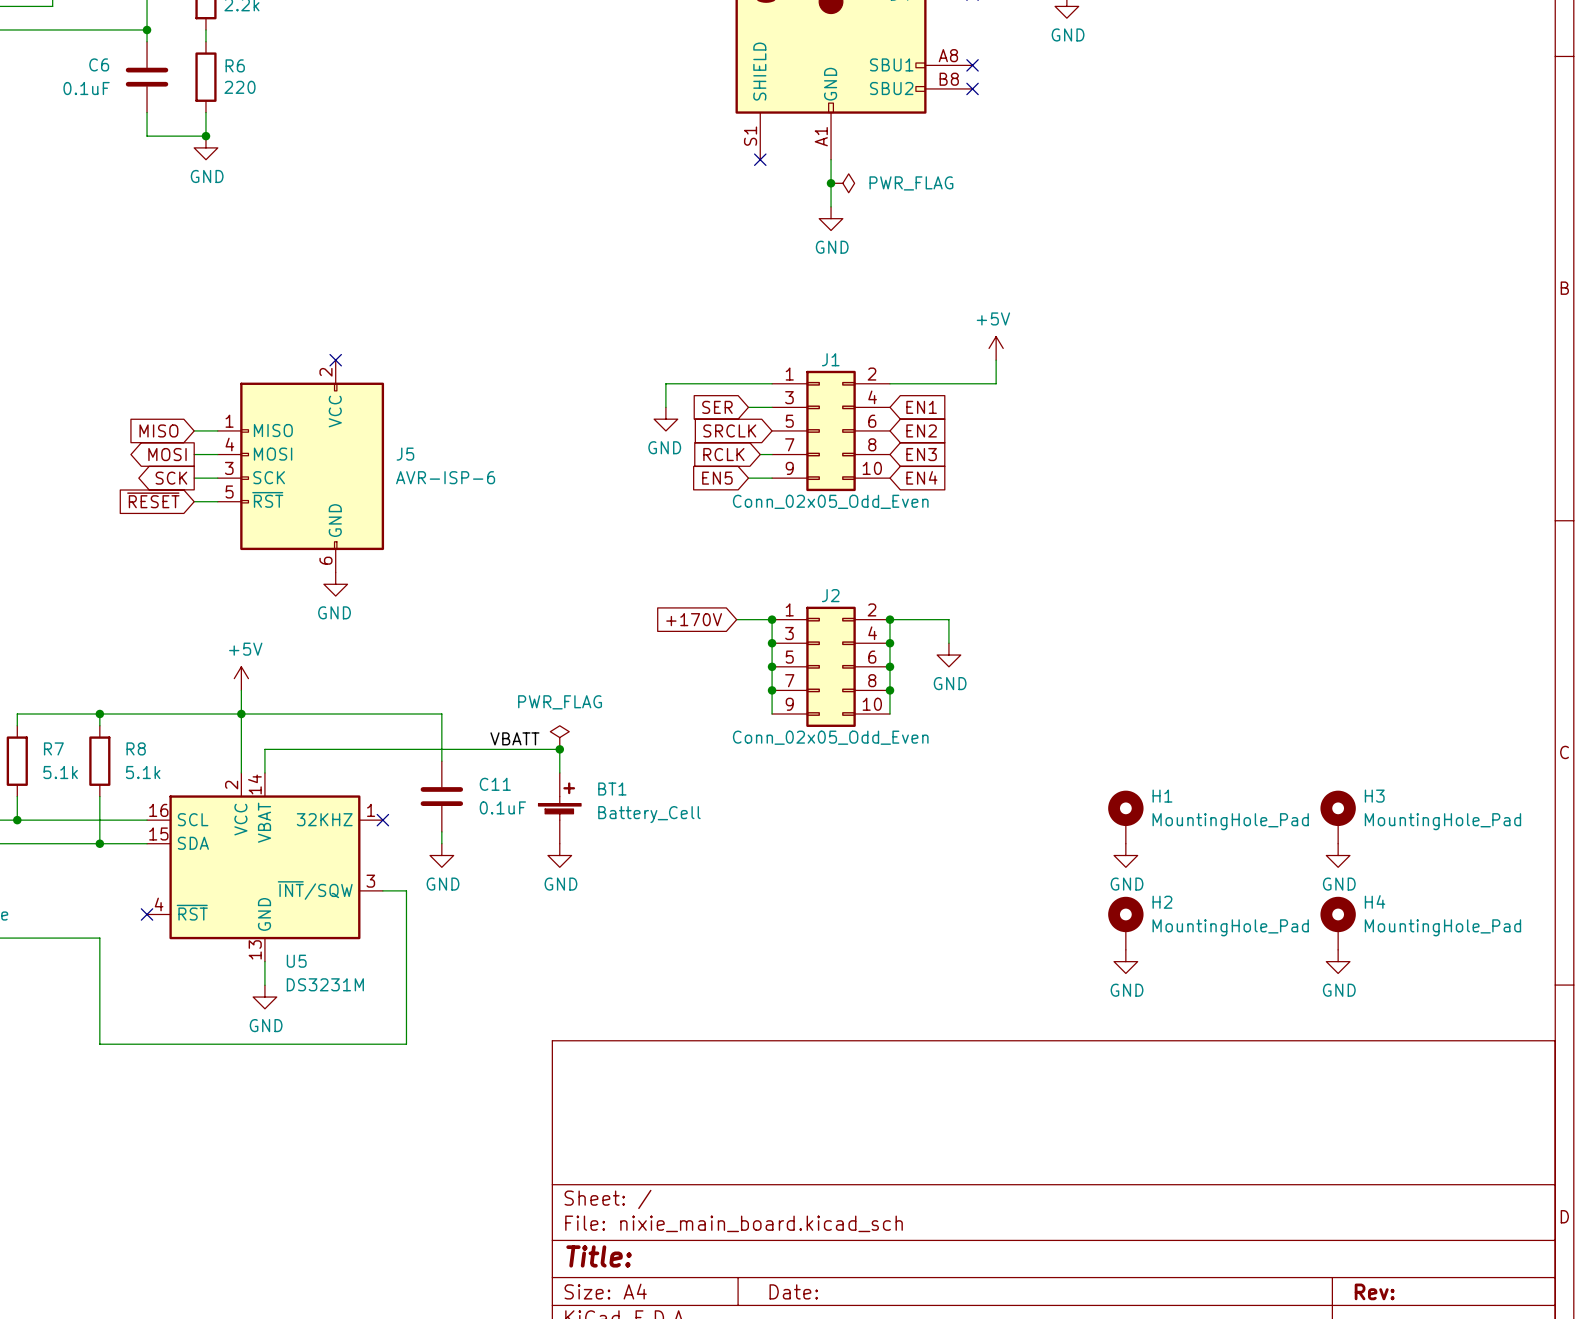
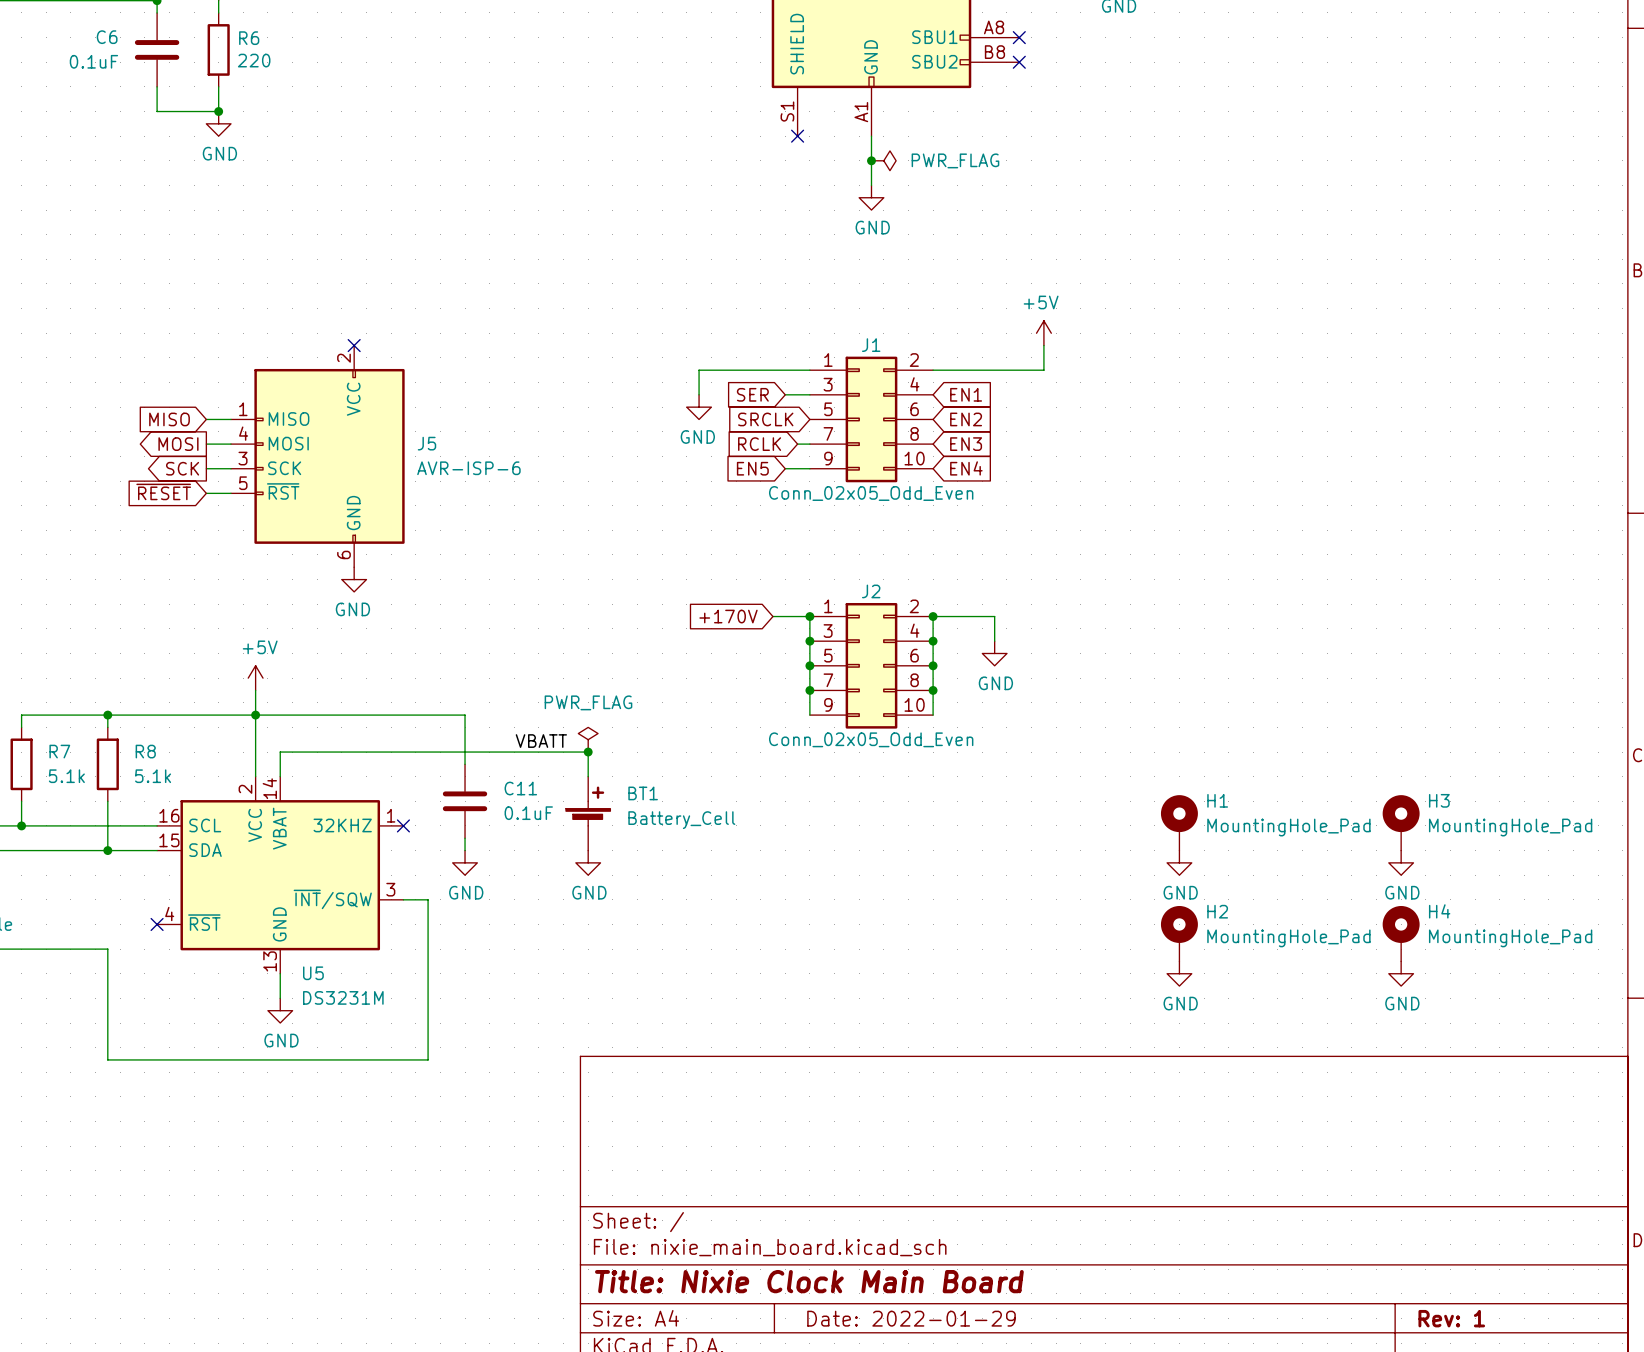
title block: Title: (599, 1256) -> Title: Nixie Clock Main Board (809, 1281)
title block: Date: (793, 1291) -> Date: 2022-01-29 (911, 1318)
title block: Rev: (1374, 1291) -> Rev: 1 (1451, 1318)

